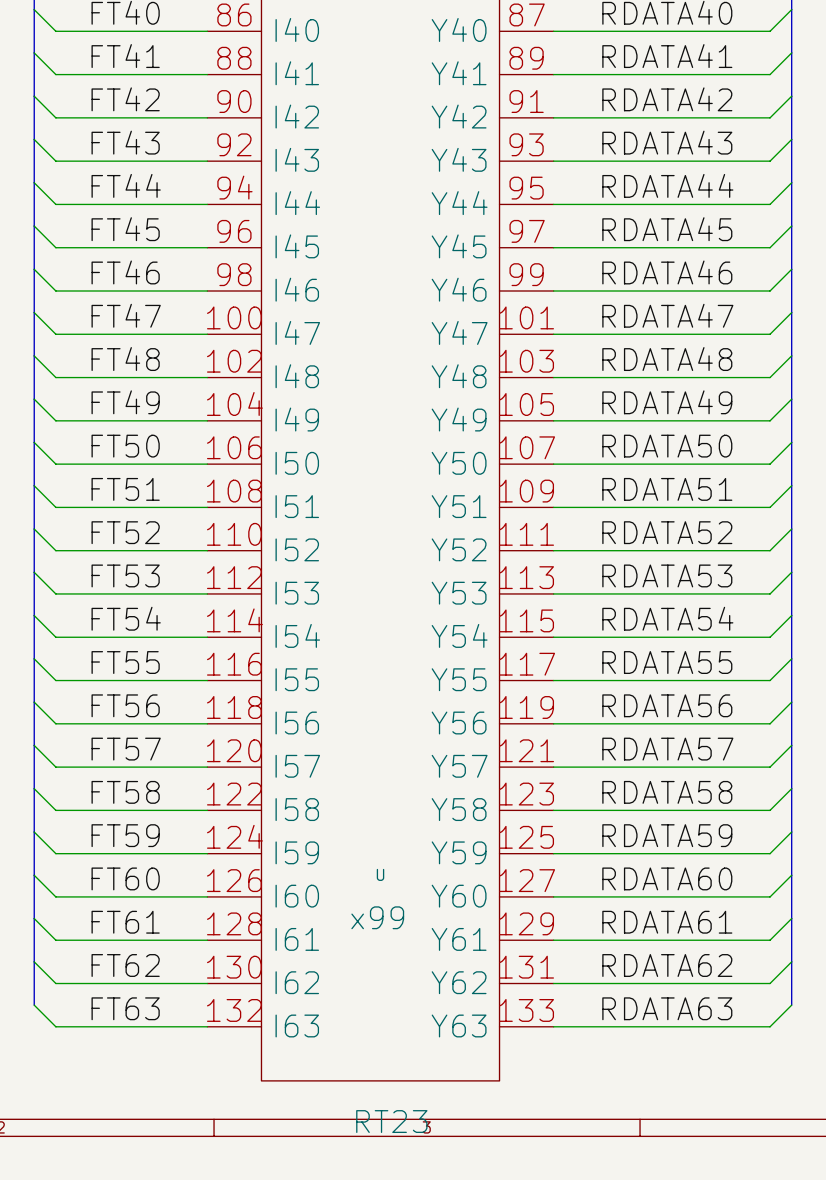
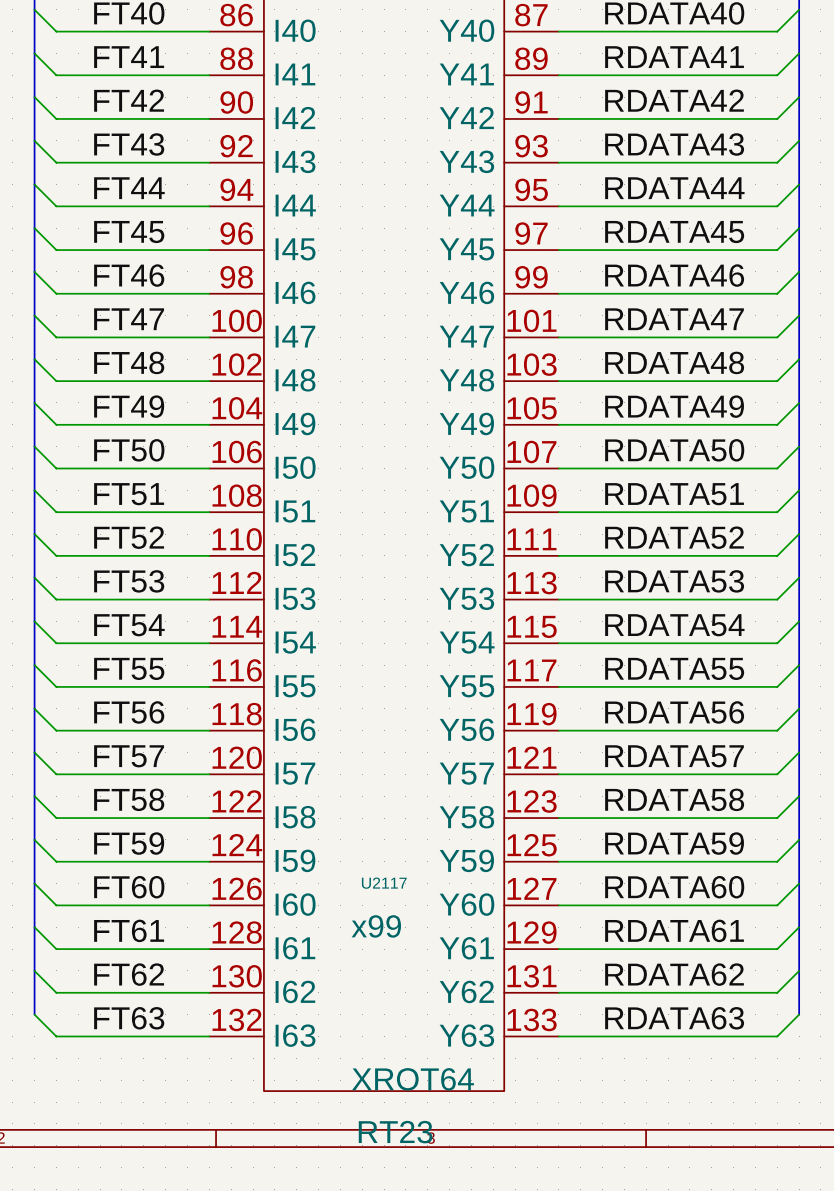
U name: U (380, 874) -> U2117 (384, 883)
U value: none -> XROT64 (412, 1079)

